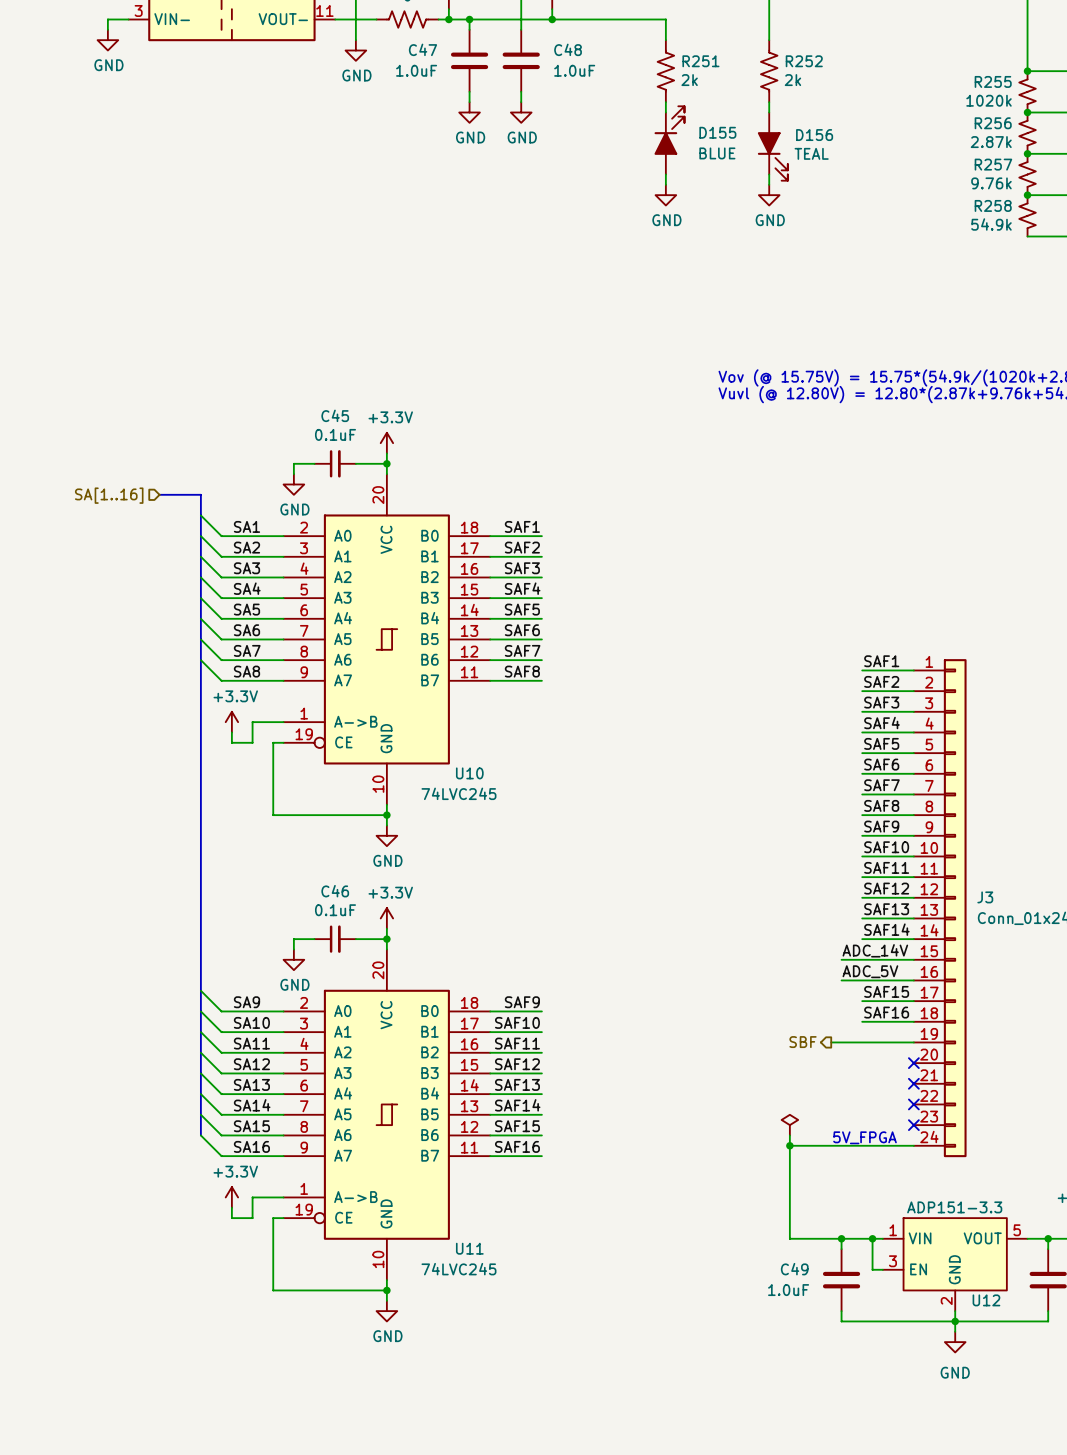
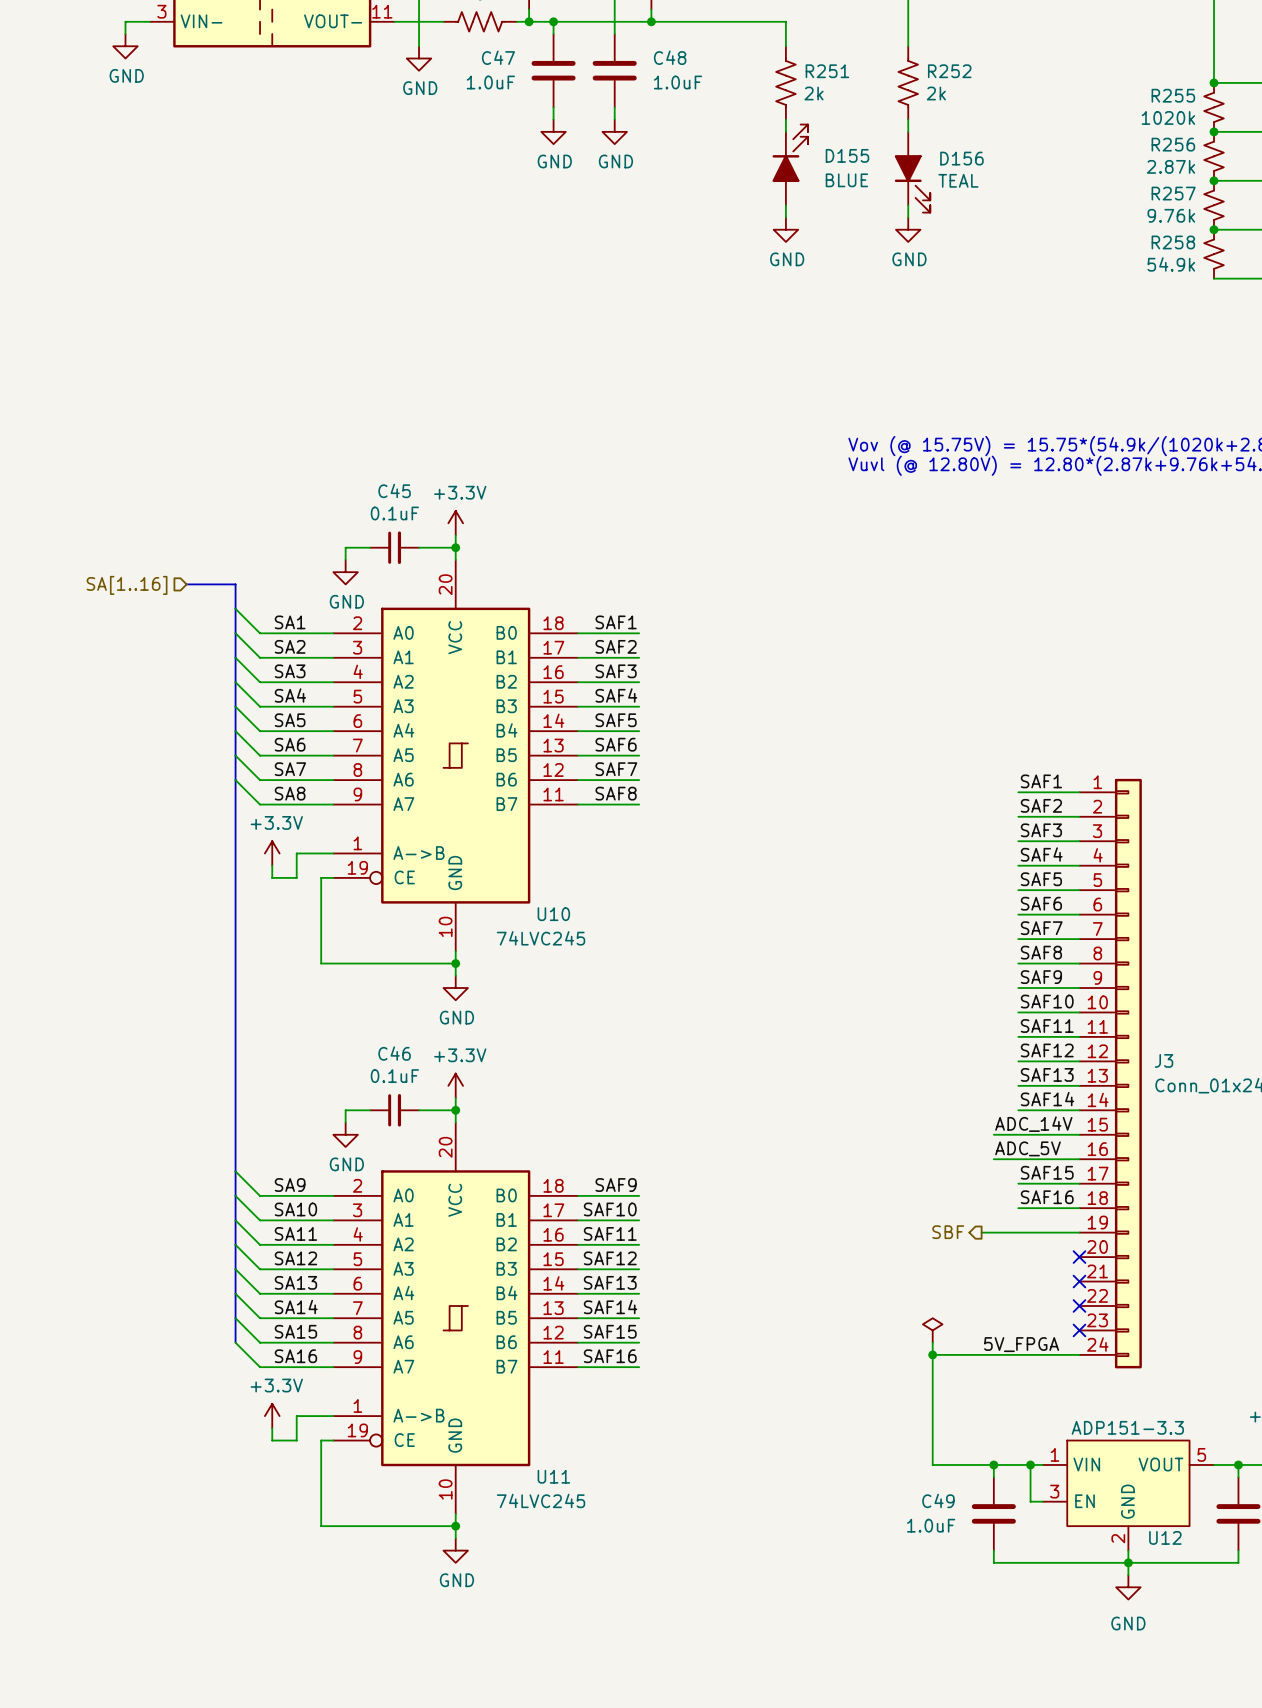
text: 5V_FPGA (865, 1137) -> none
label: none -> 5V_FPGA (1021, 1344)

